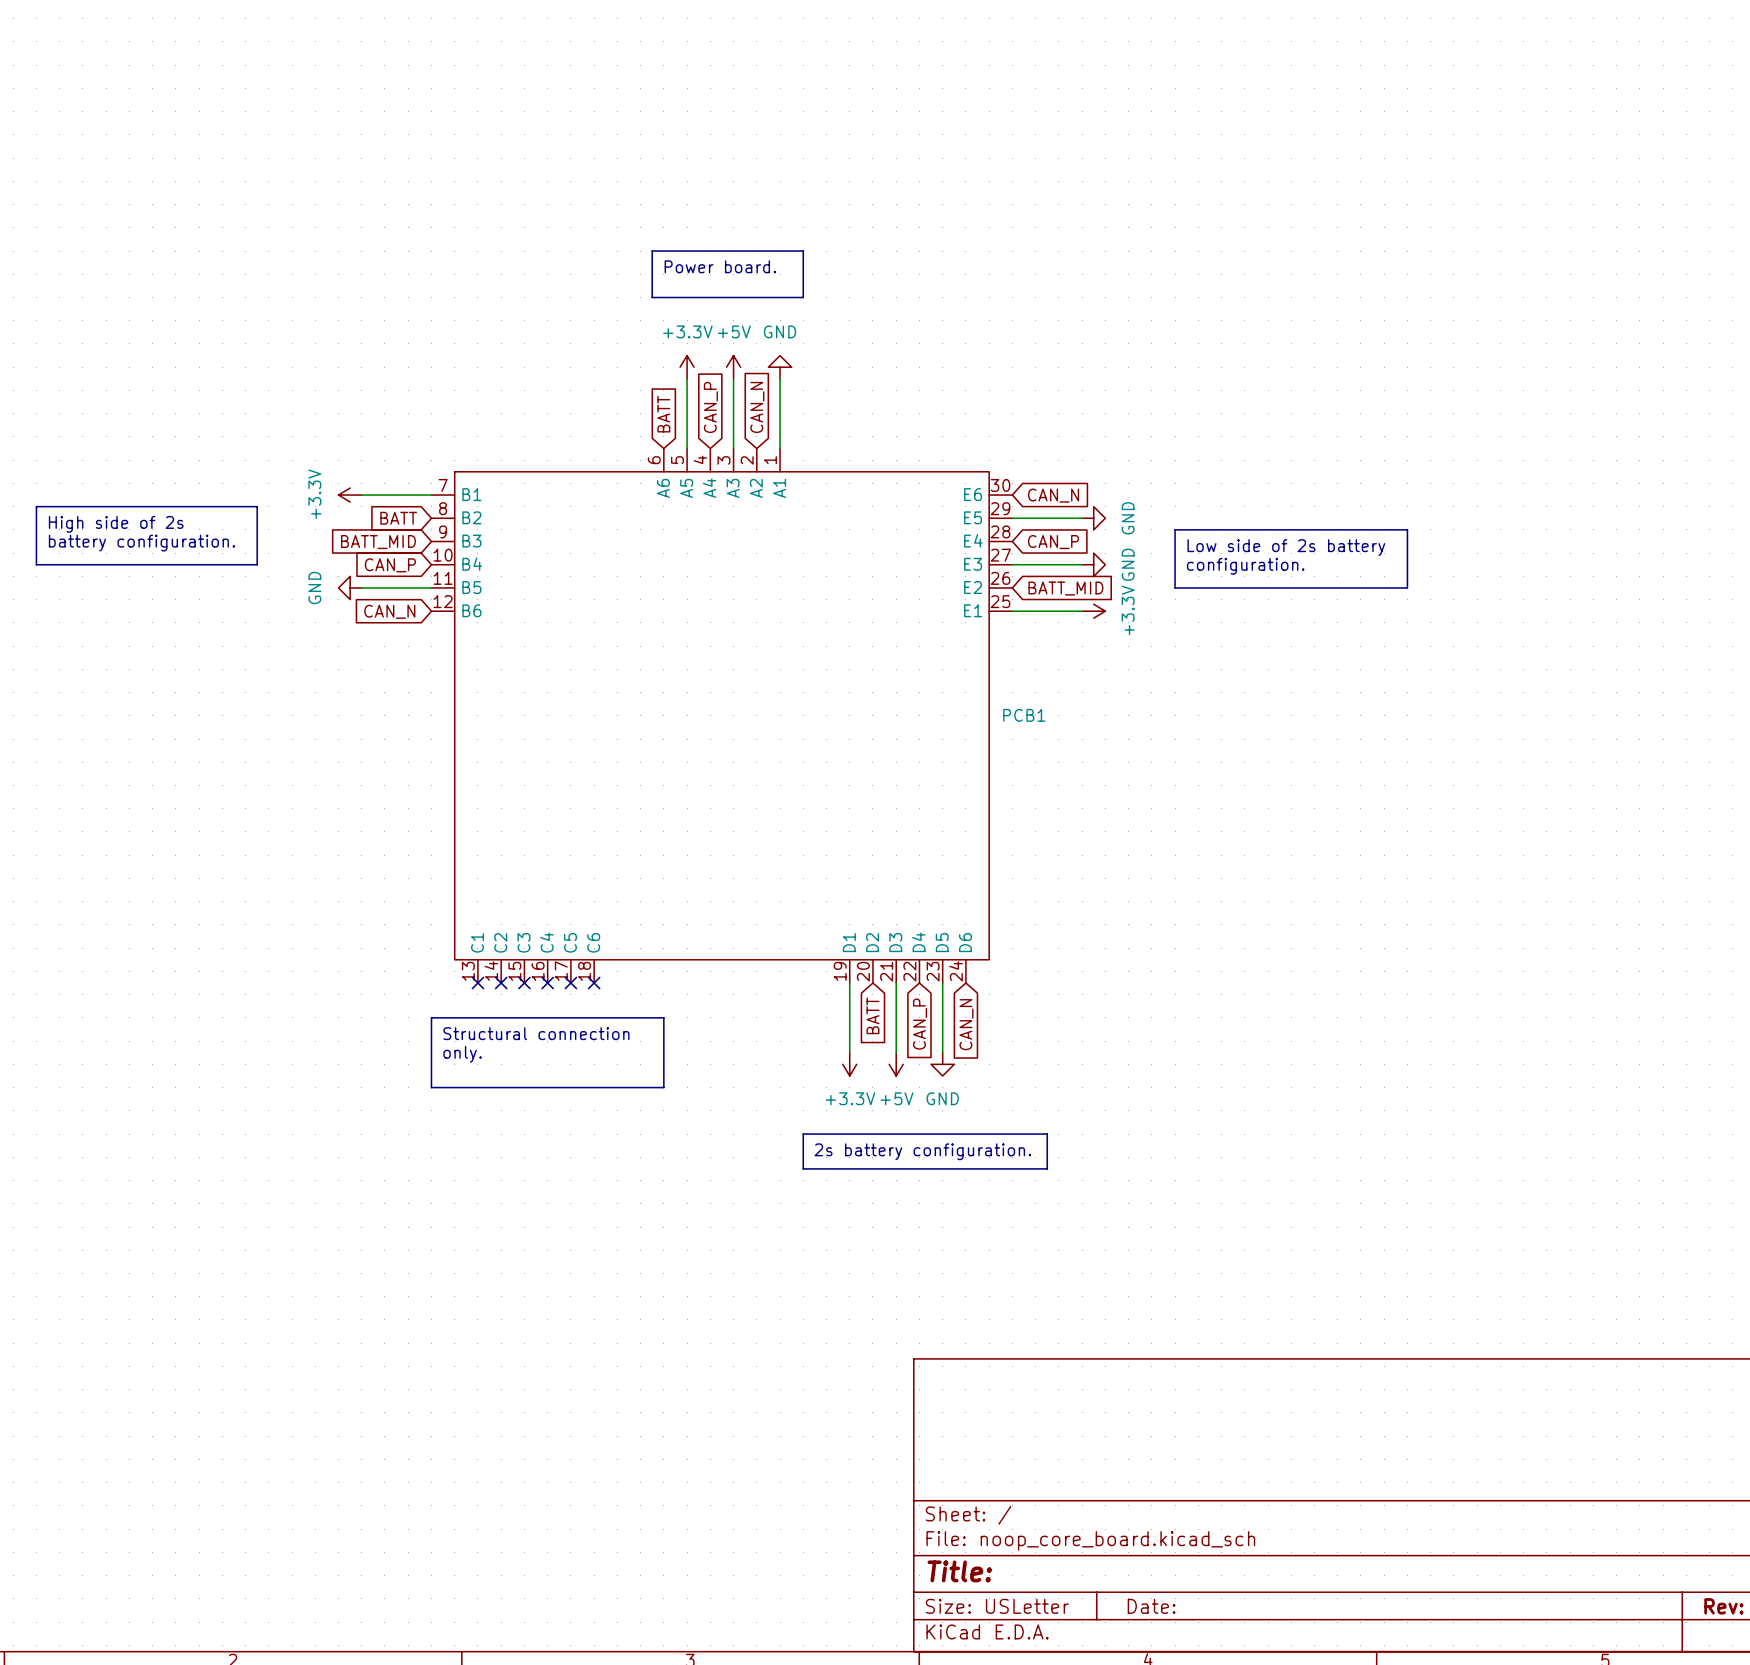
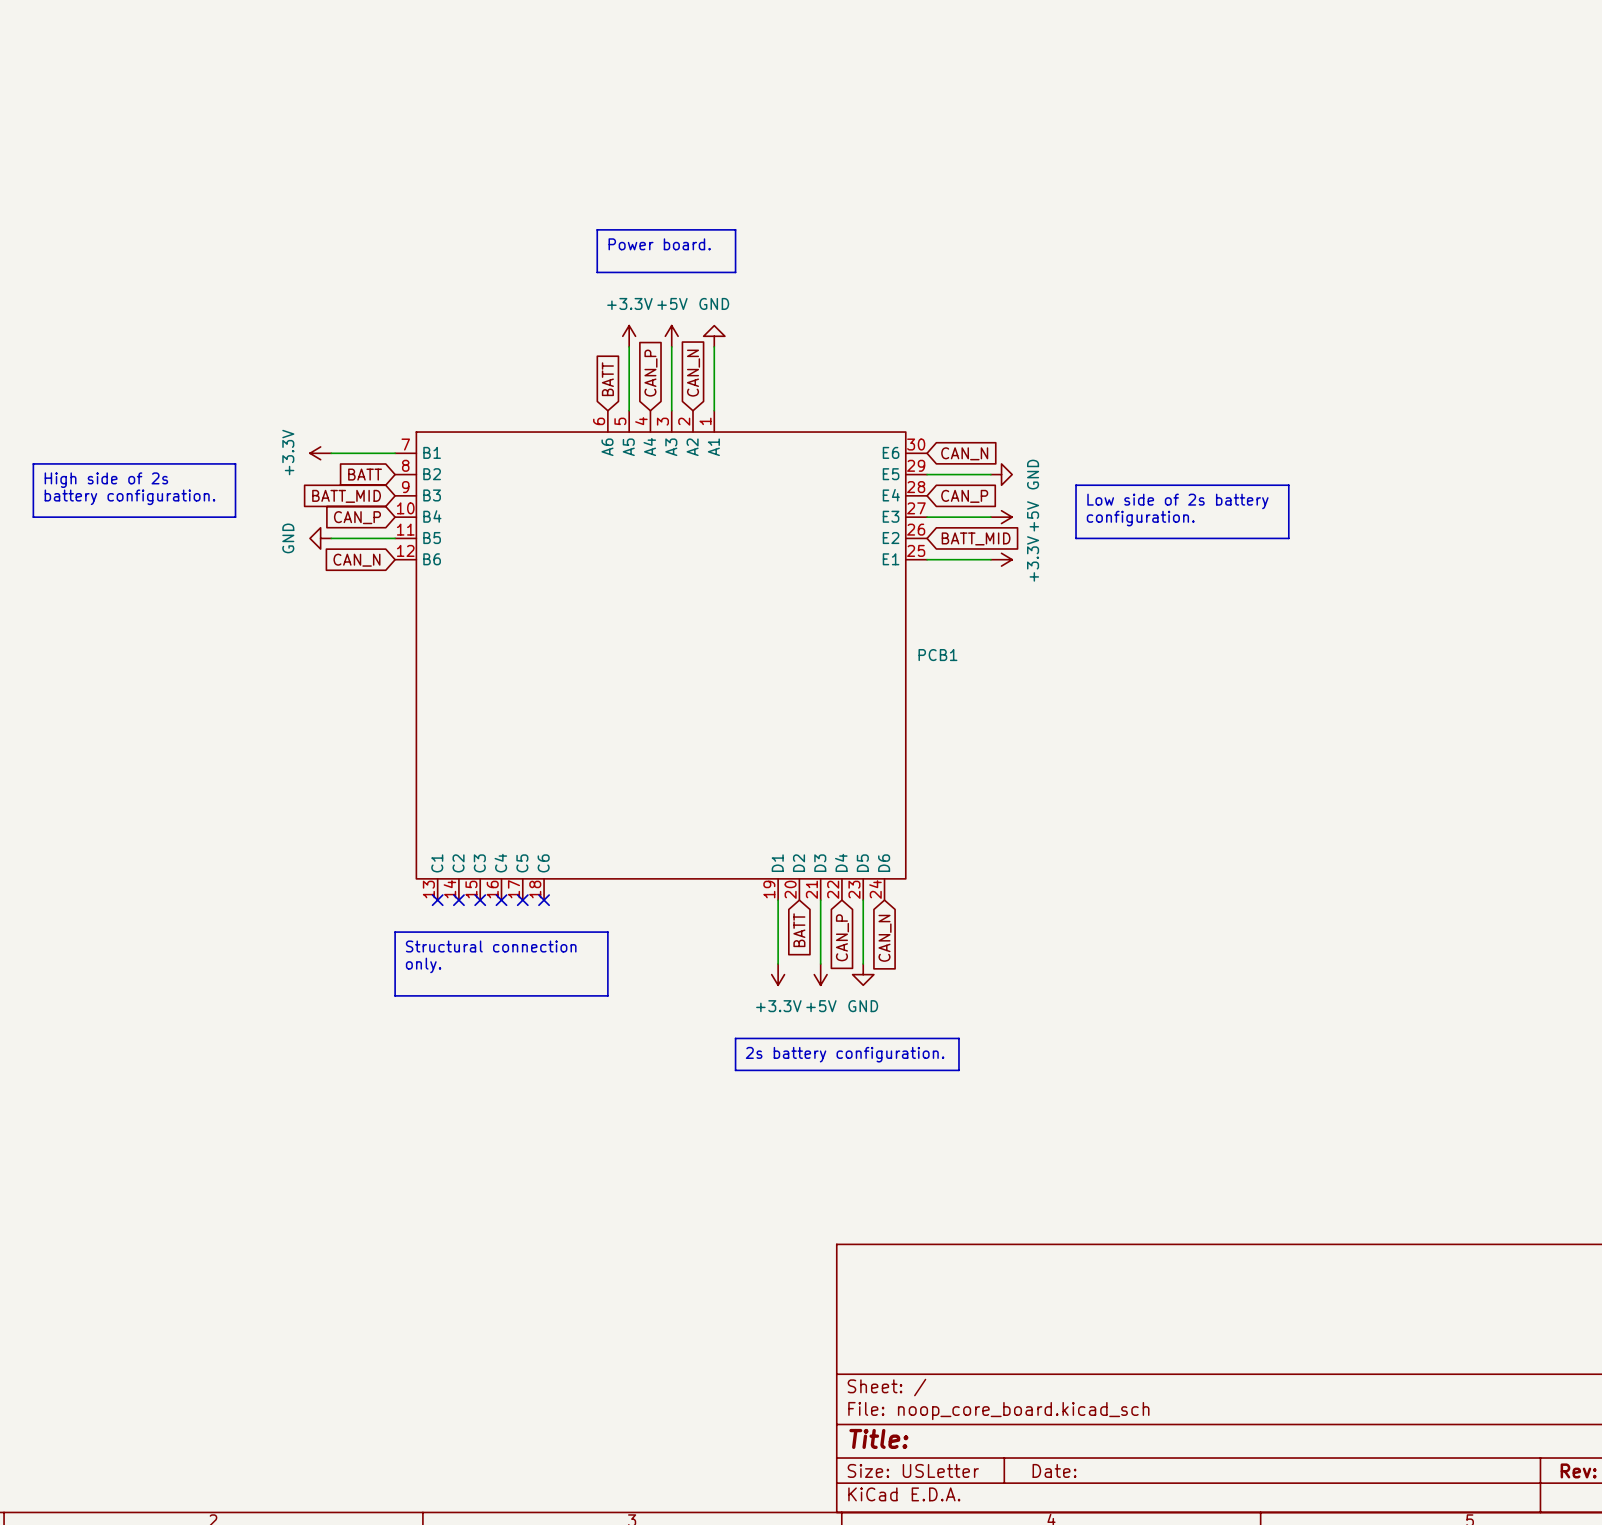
power symbol: GND (1093, 564) -> +5V (1001, 517)

